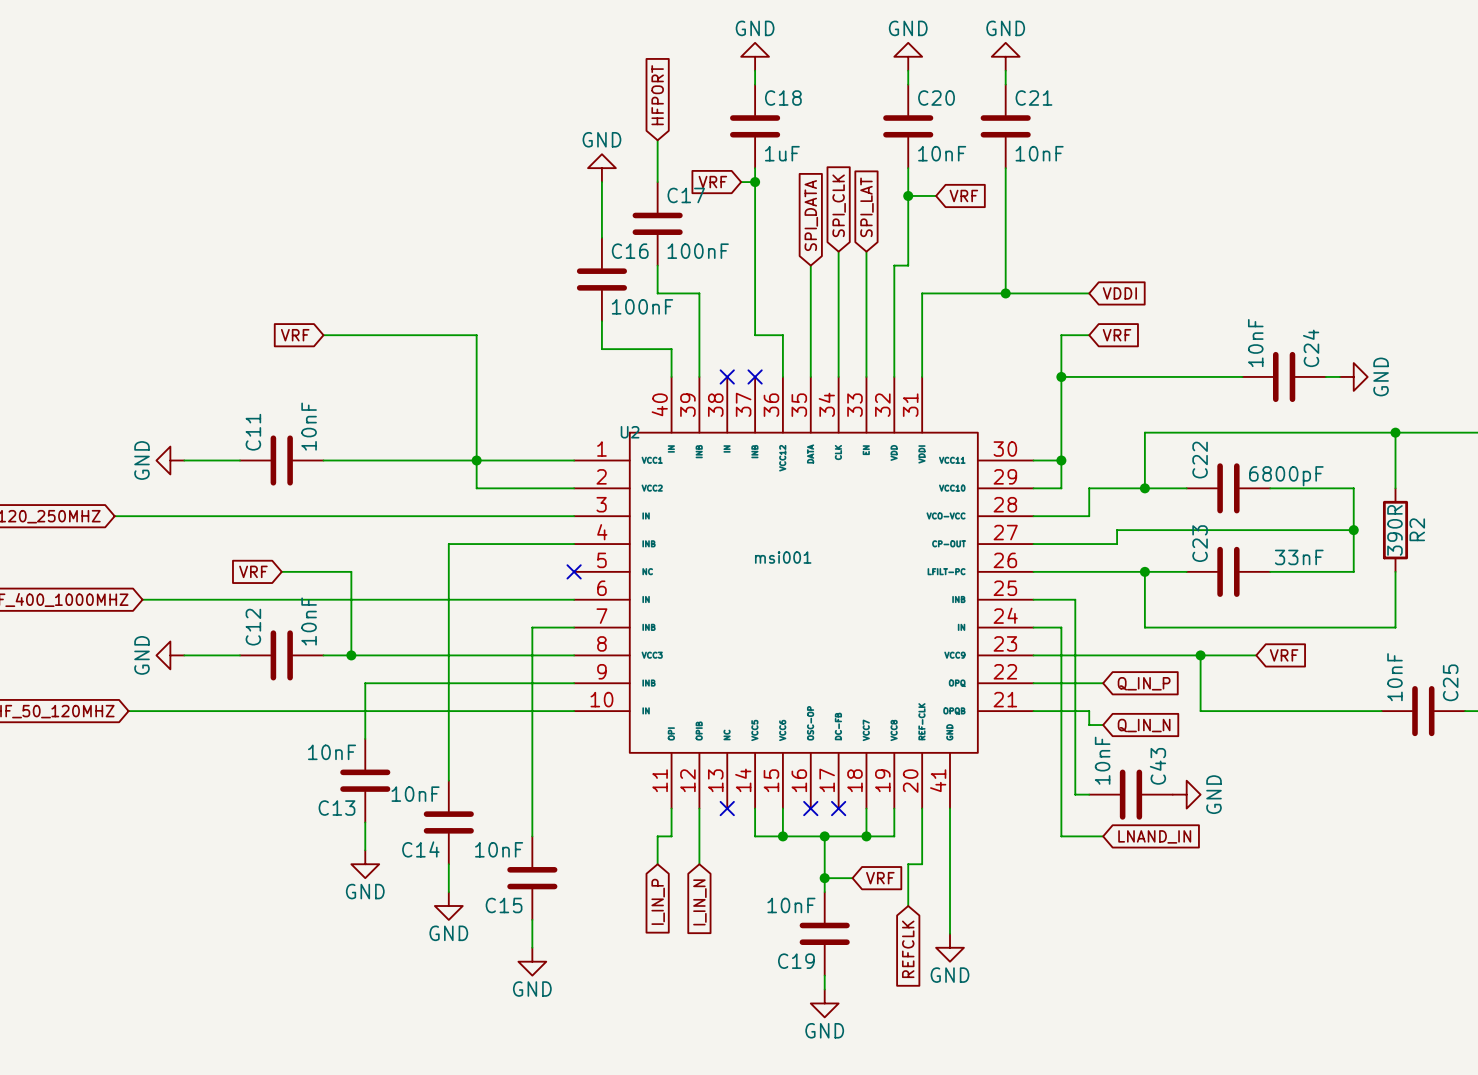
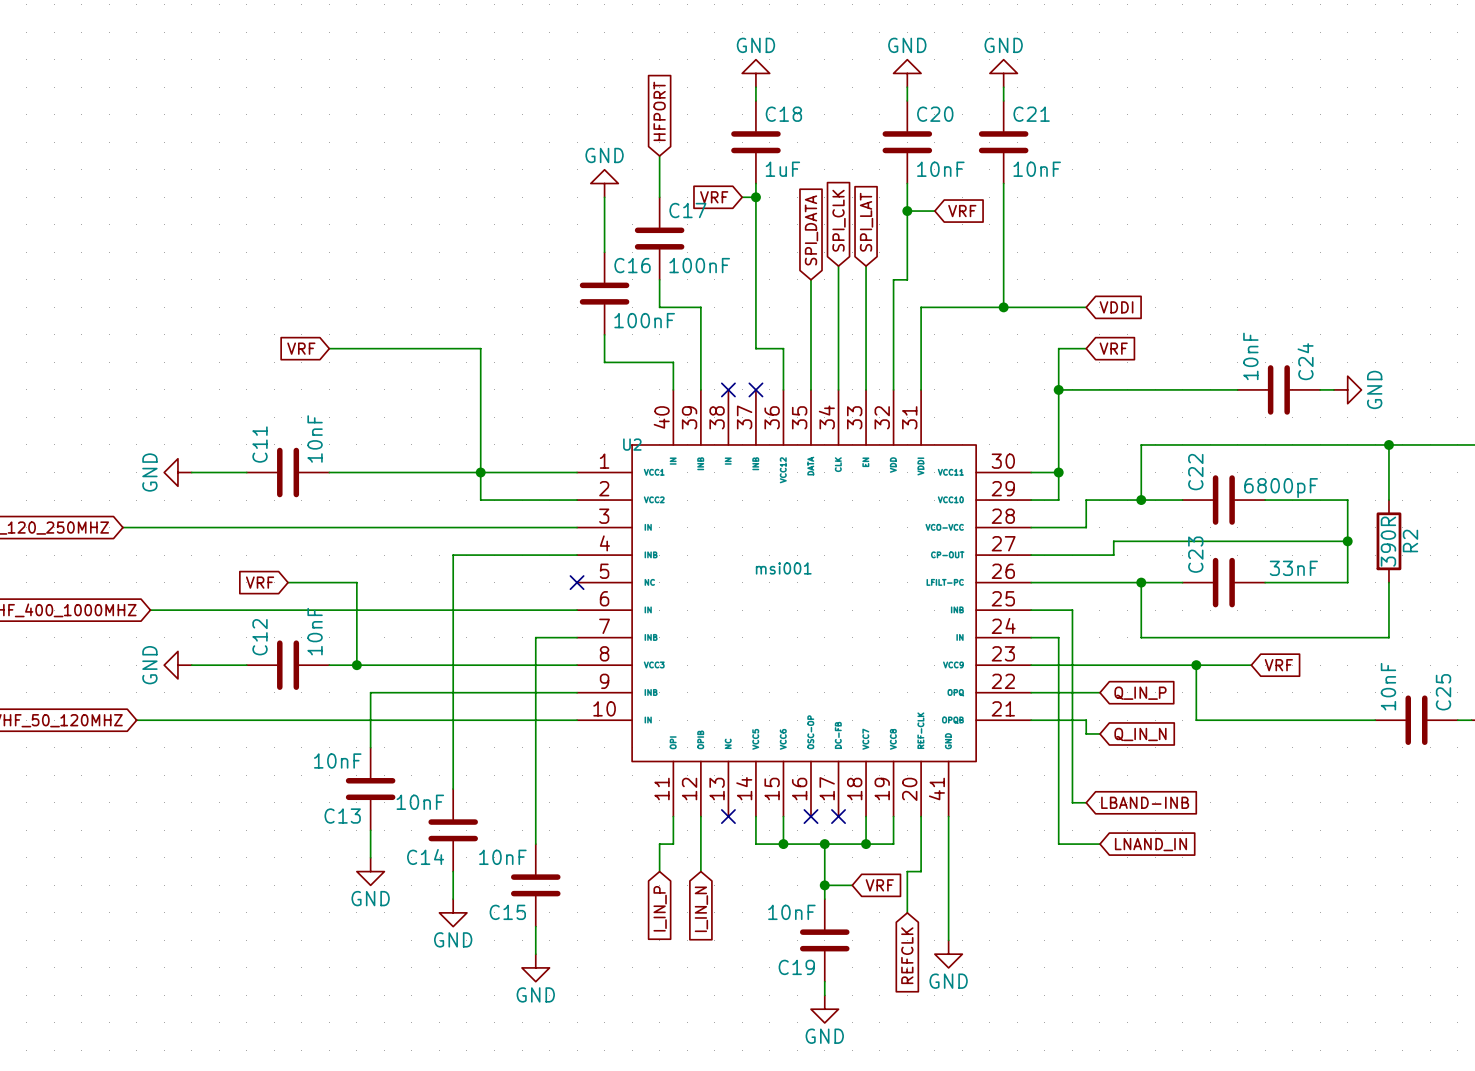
C43: 10nF (1130, 794) -> none
global label: none -> LBAND-INB (1145, 802)
power symbol: GND (1186, 794) -> none

